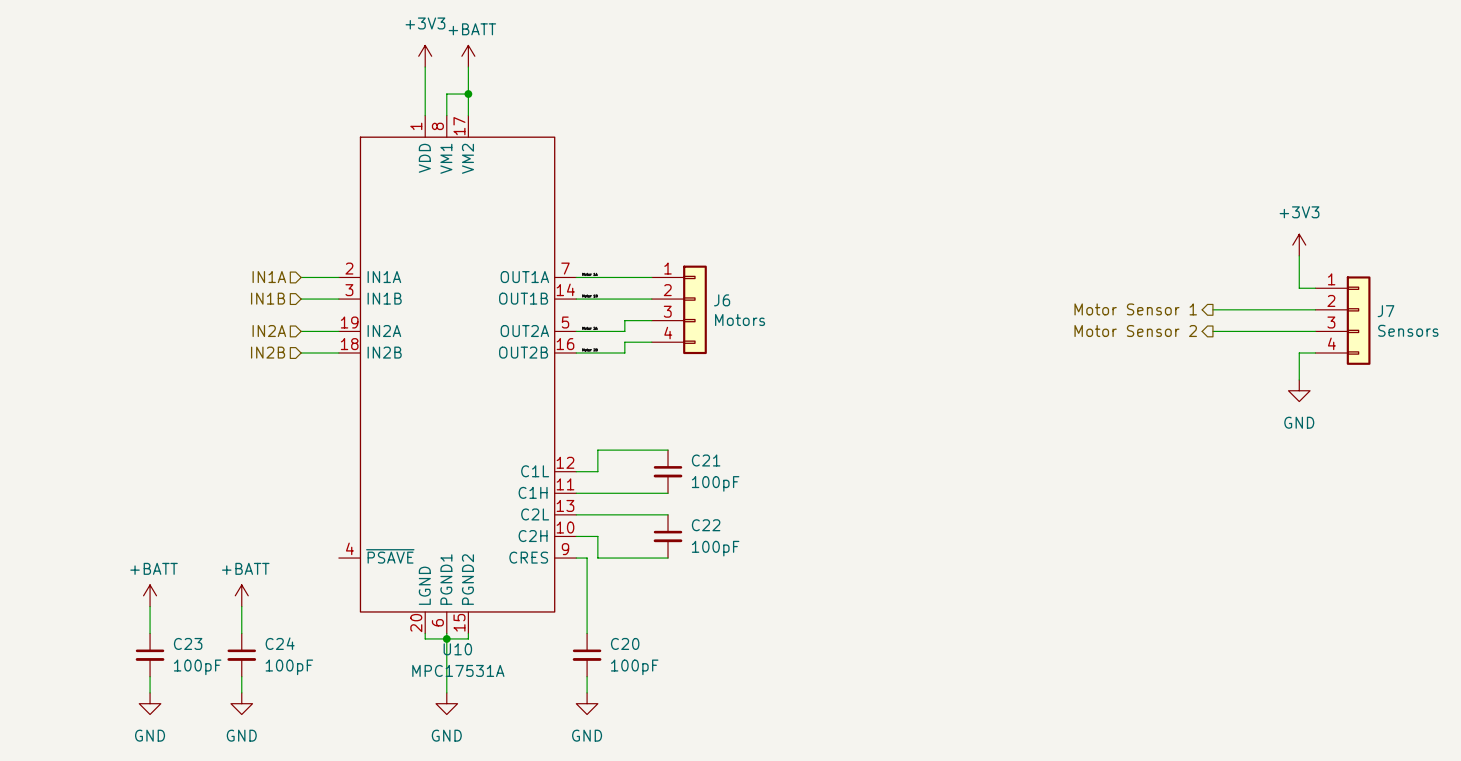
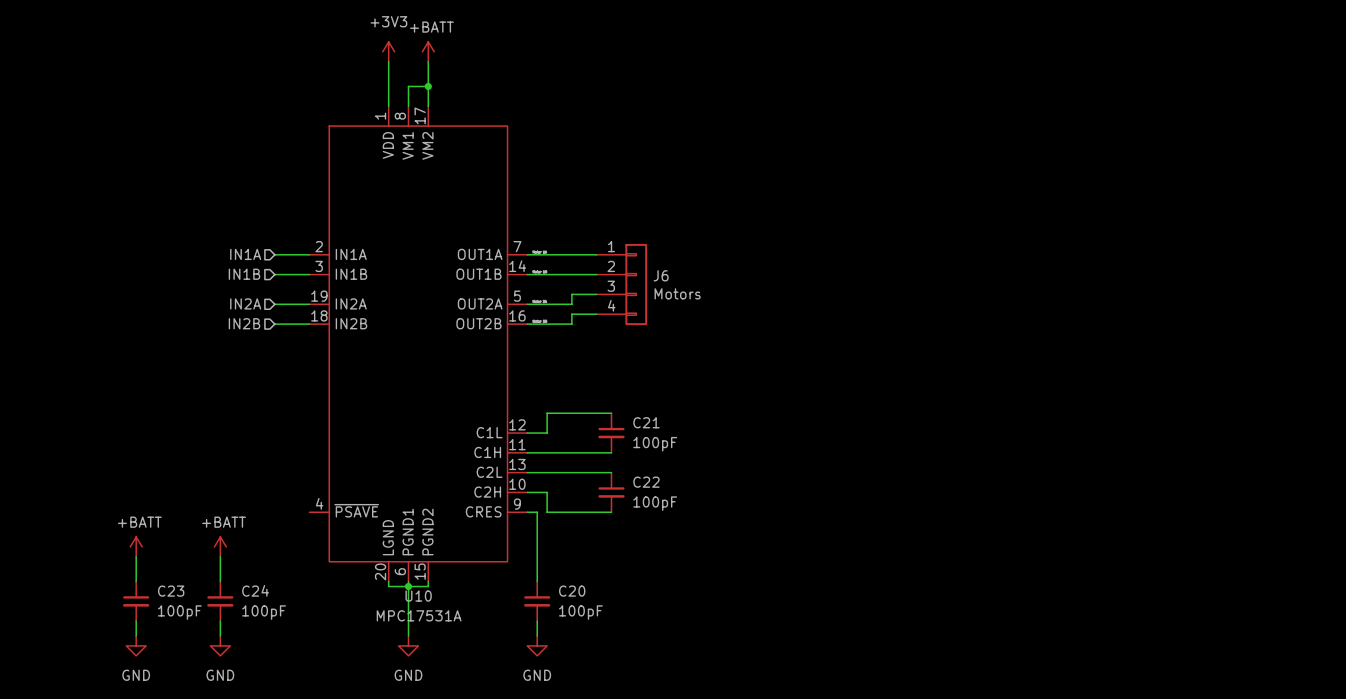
power symbol: +3V3 (1299, 245) -> none
wire: (1299, 255) (1299, 288) (1315, 288) -> none
hierarchical label: Motor Sensor 1 (1135, 309) -> none
wire: (1212, 309) (1315, 309) -> none
J7: Sensors (1342, 320) -> none
hierarchical label: Motor Sensor 2 (1135, 331) -> none
wire: (1212, 331) (1315, 331) -> none
wire: (1315, 353) (1299, 353) (1299, 379) -> none
power symbol: GND (1299, 390) -> none

